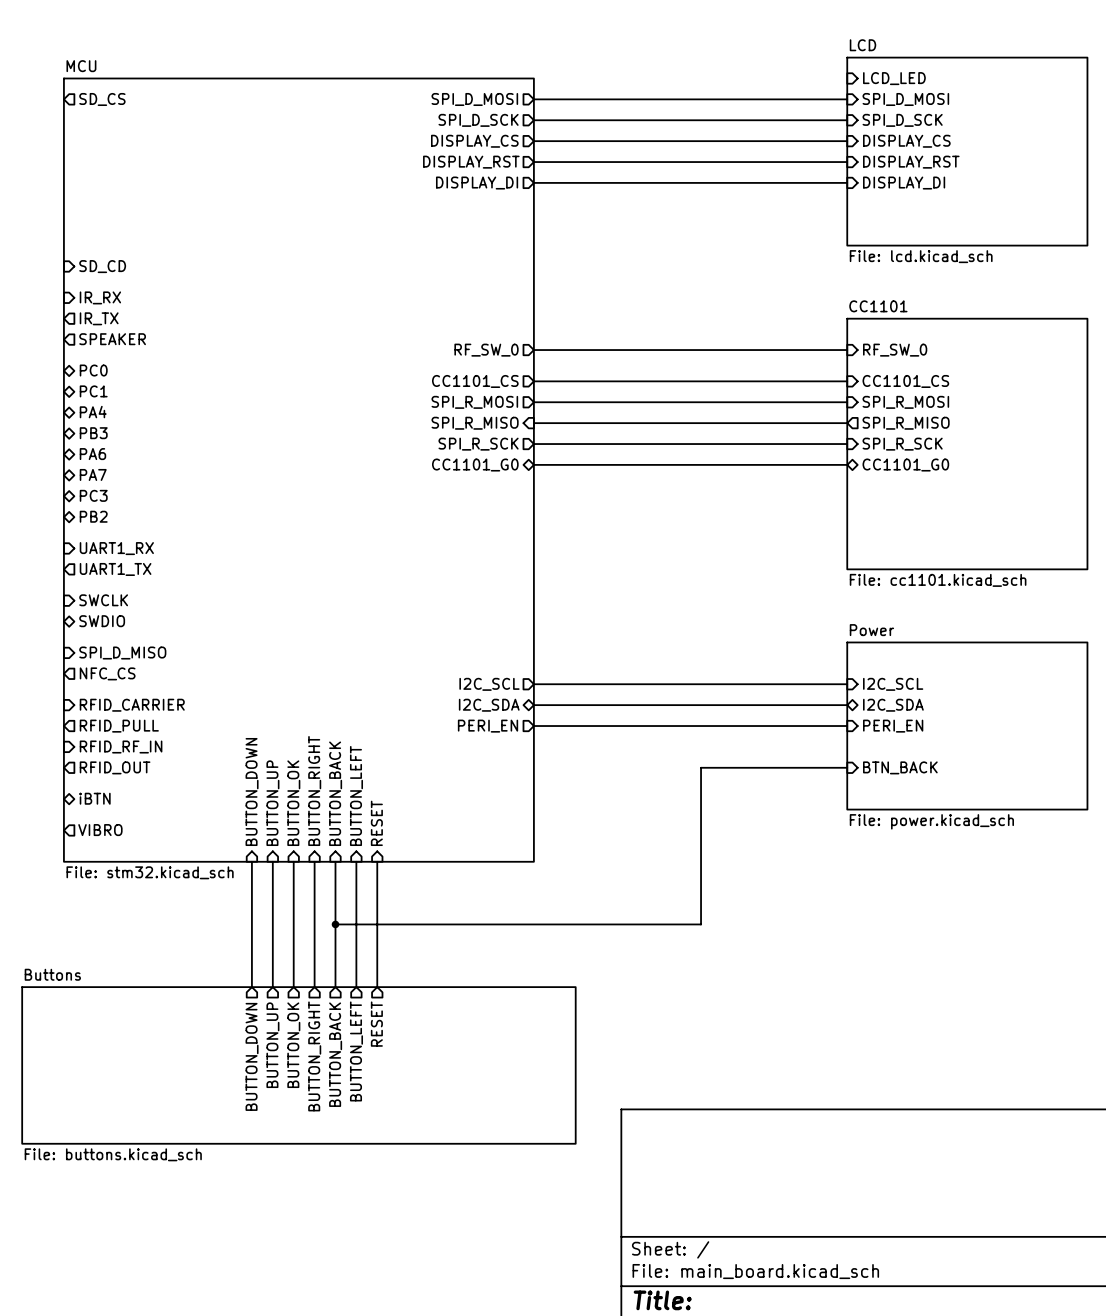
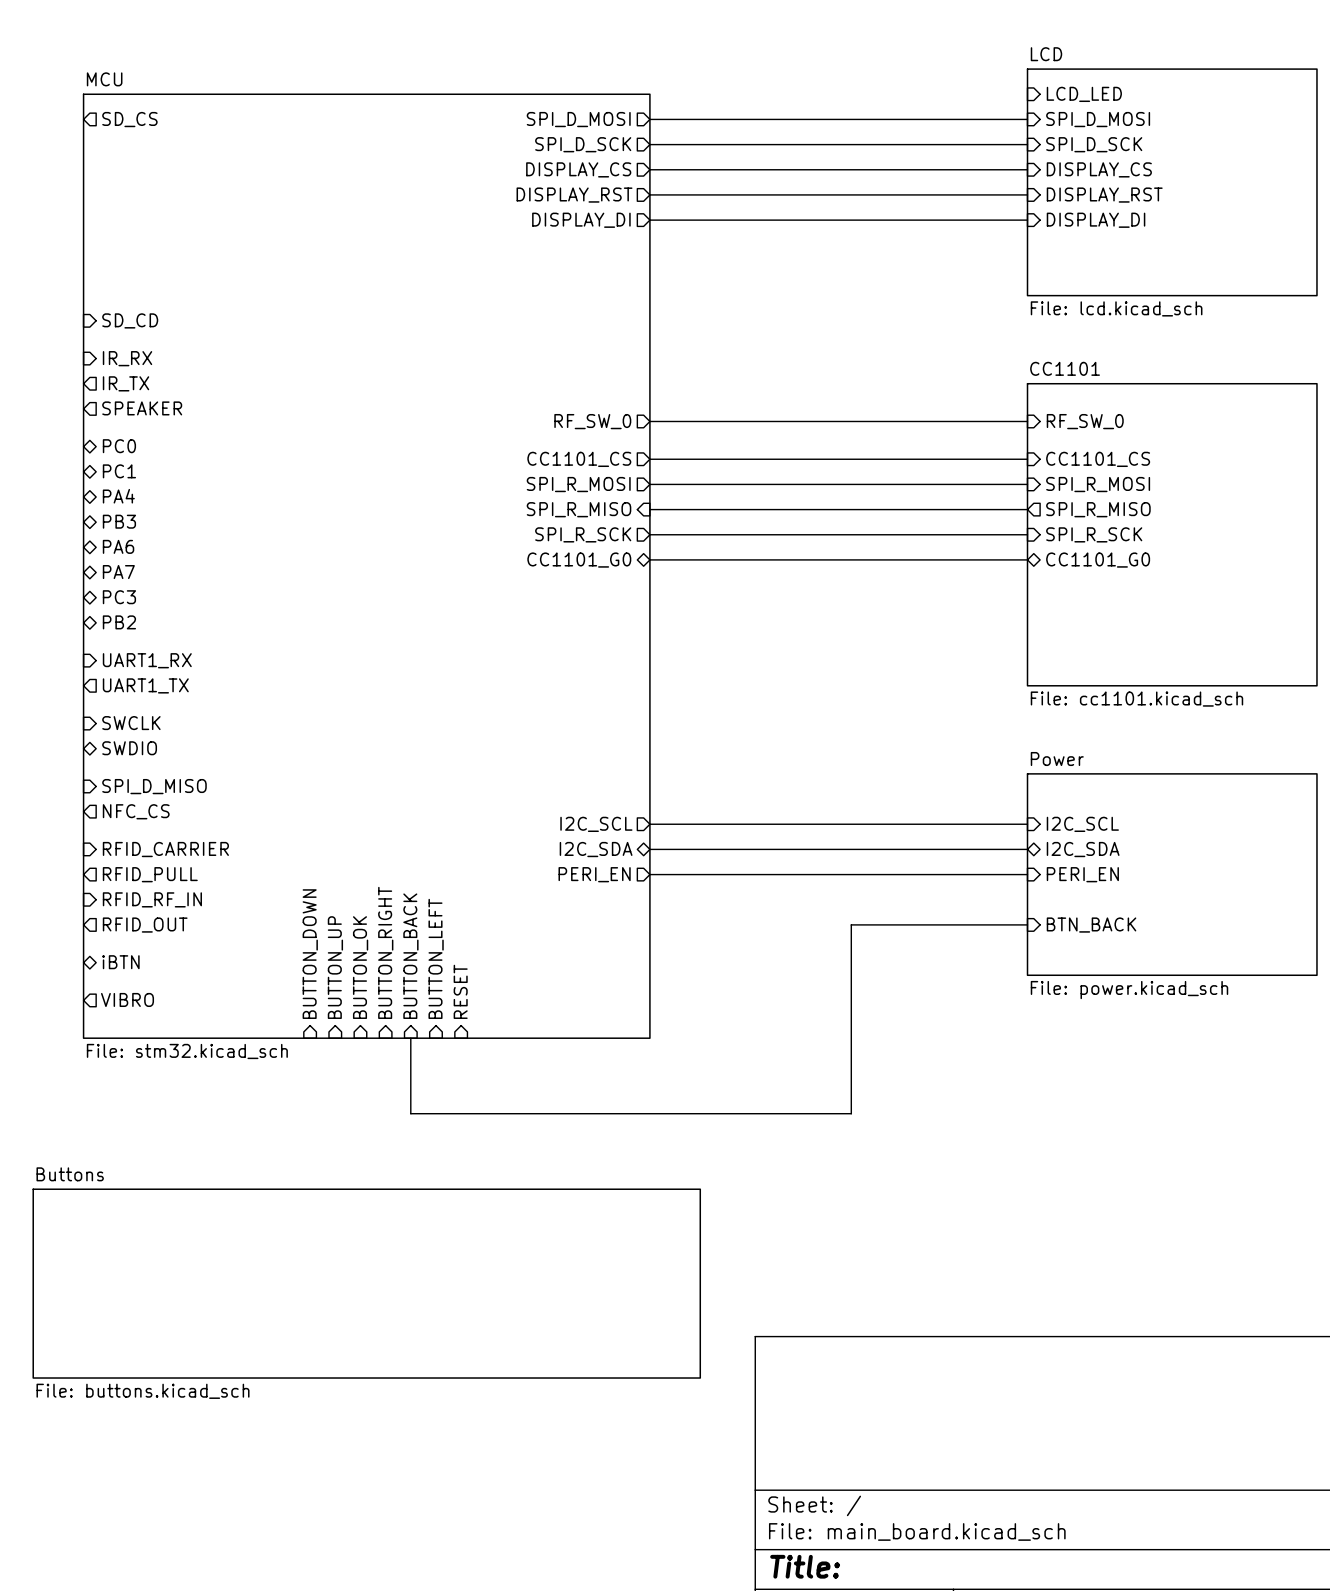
wire: (251, 861) (251, 987) -> none
wire: (272, 861) (272, 987) -> none
wire: (293, 861) (293, 987) -> none
wire: (314, 861) (314, 987) -> none
wire: (356, 861) (356, 987) -> none
wire: (377, 861) (377, 987) -> none
wire: (335, 924) (335, 987) -> none
junction: (335, 924) -> none
sheet pin: RESET (376, 1024) -> none
sheet pin: BUTTON_UP (272, 1045) -> none
sheet pin: BUTTON_OK (293, 1045) -> none
sheet pin: BUTTON_LEFT (356, 1051) -> none
sheet pin: BUTTON_BACK (335, 1054) -> none
sheet pin: BUTTON_DOWN (252, 1056) -> none
sheet pin: BUTTON_RIGHT (314, 1056) -> none

